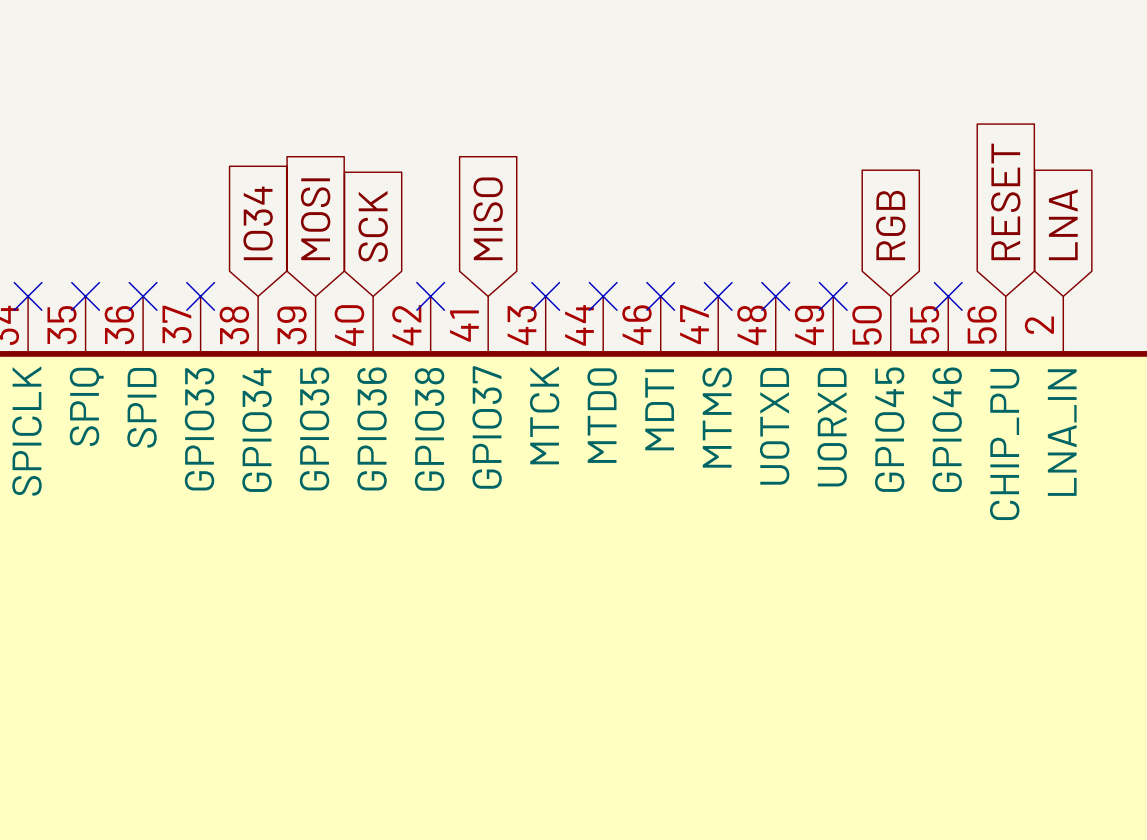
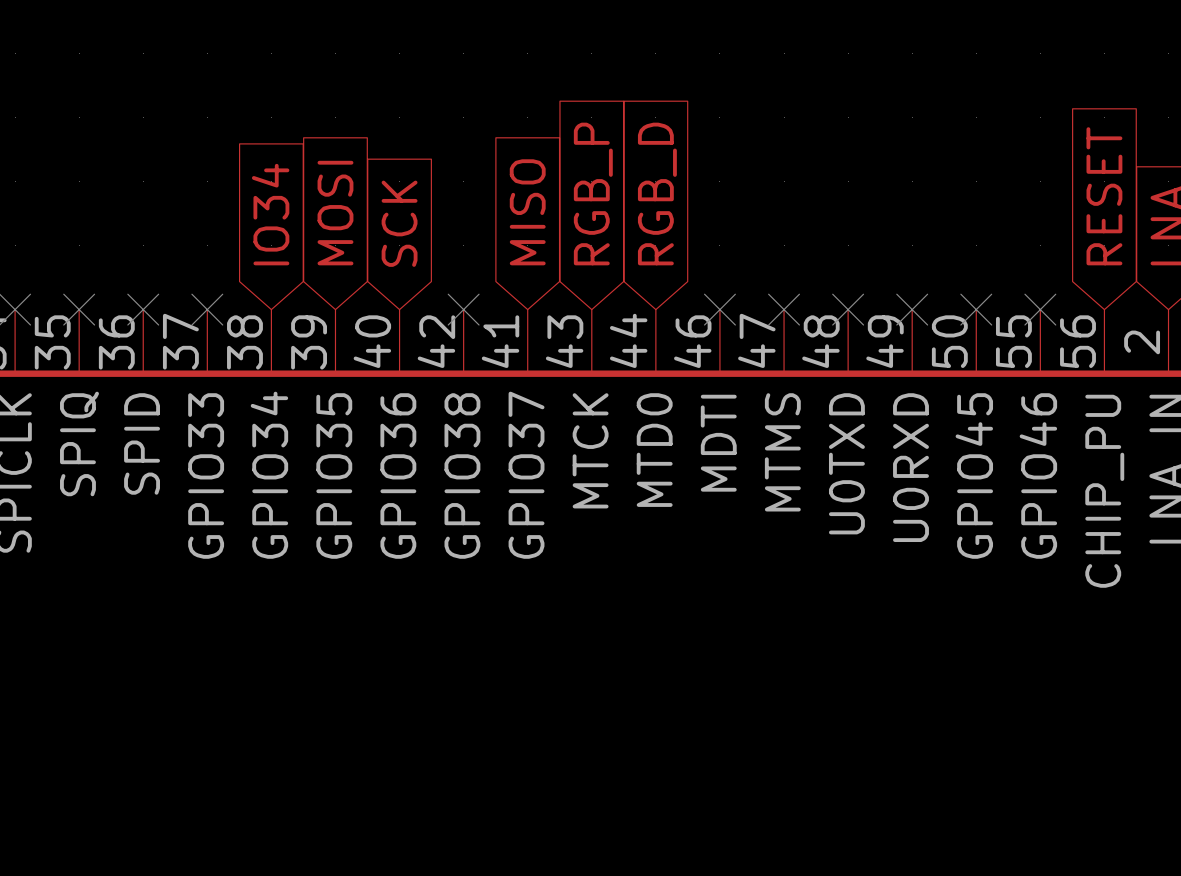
global label: none -> RGB_P (593, 193)
global label: none -> RGB_D (657, 193)
global label: RGB (890, 225) -> none
no-connect mark: (545, 296) -> none
no-connect mark: (603, 296) -> none
no-connect mark: none -> (976, 309)

